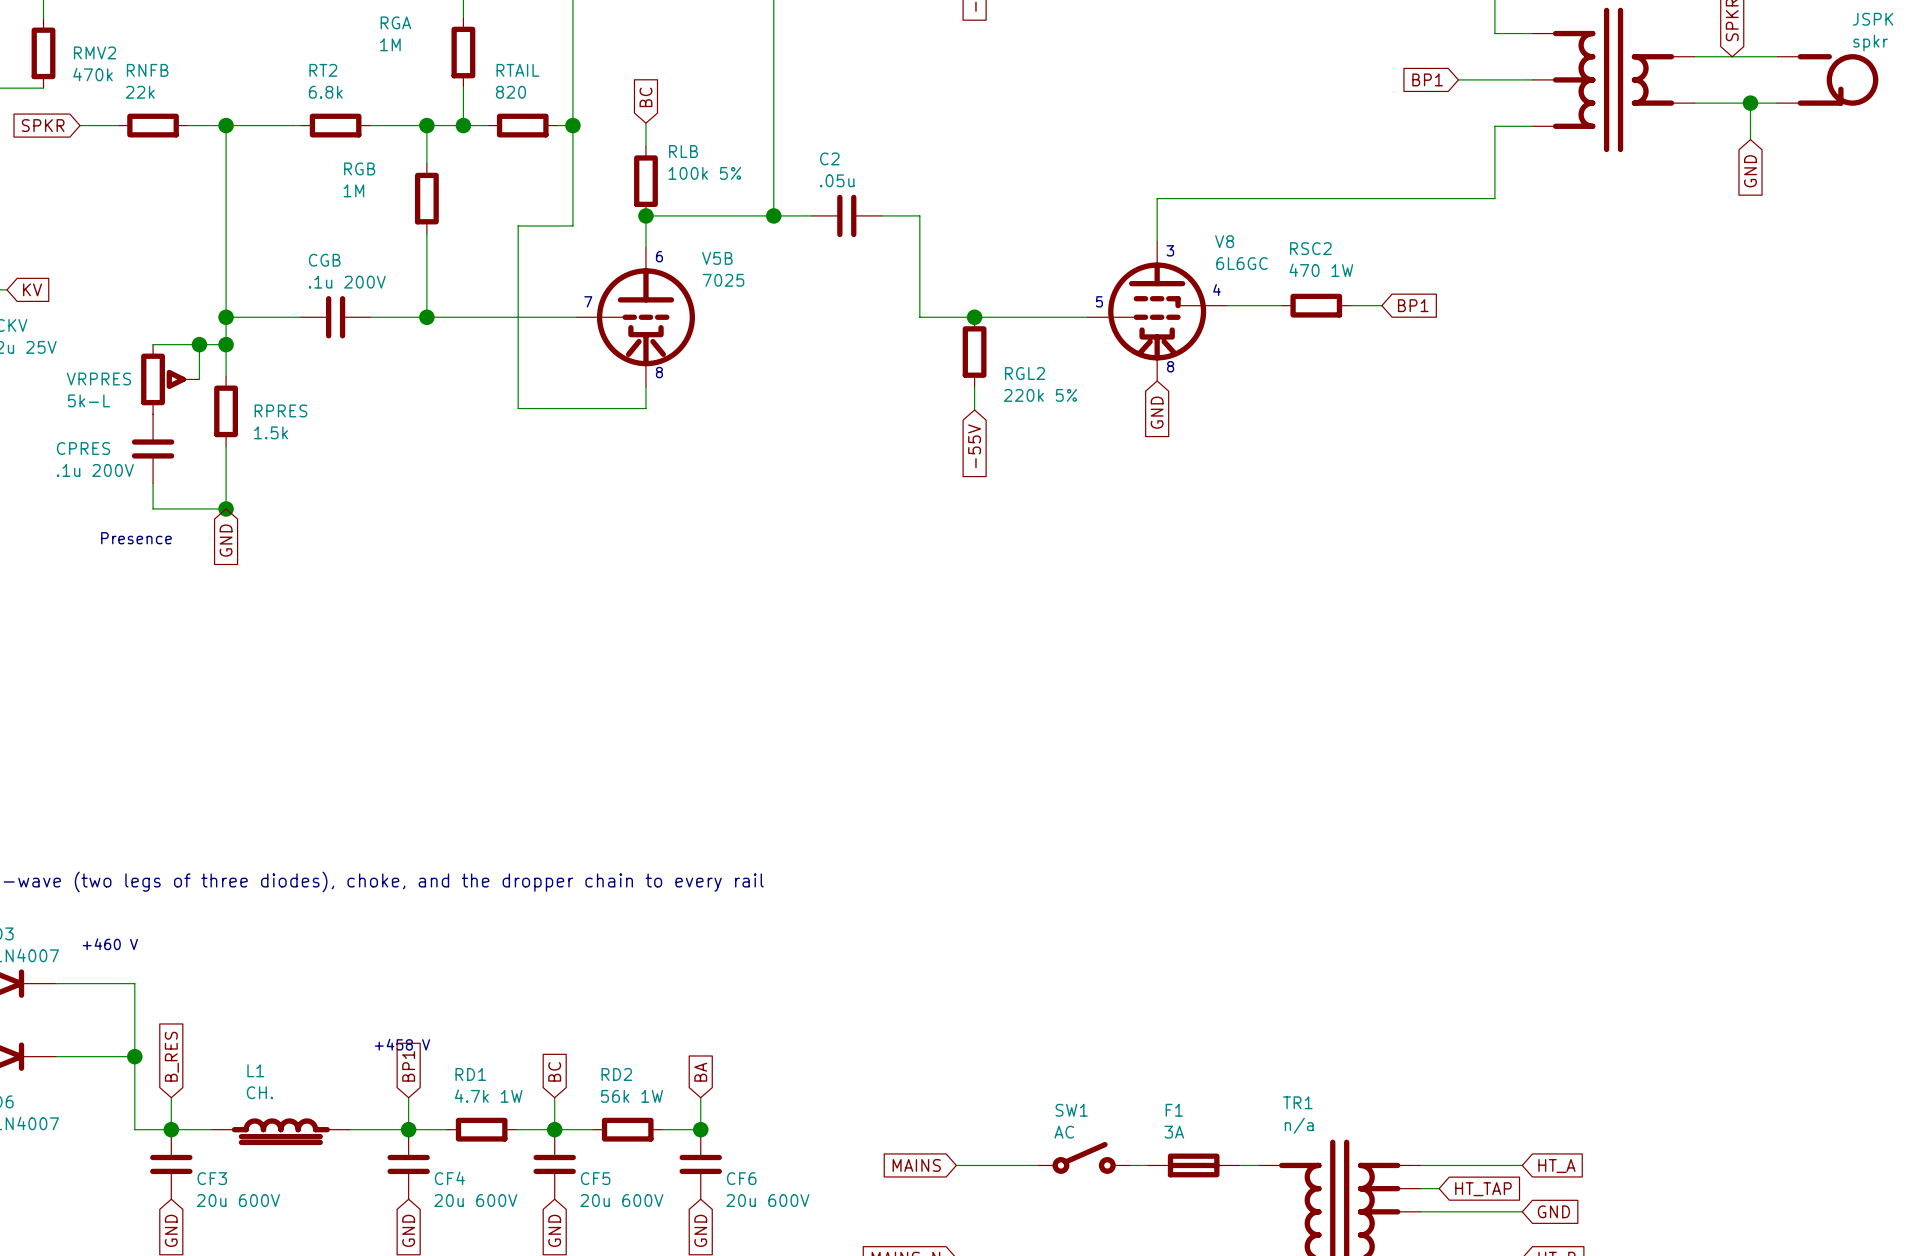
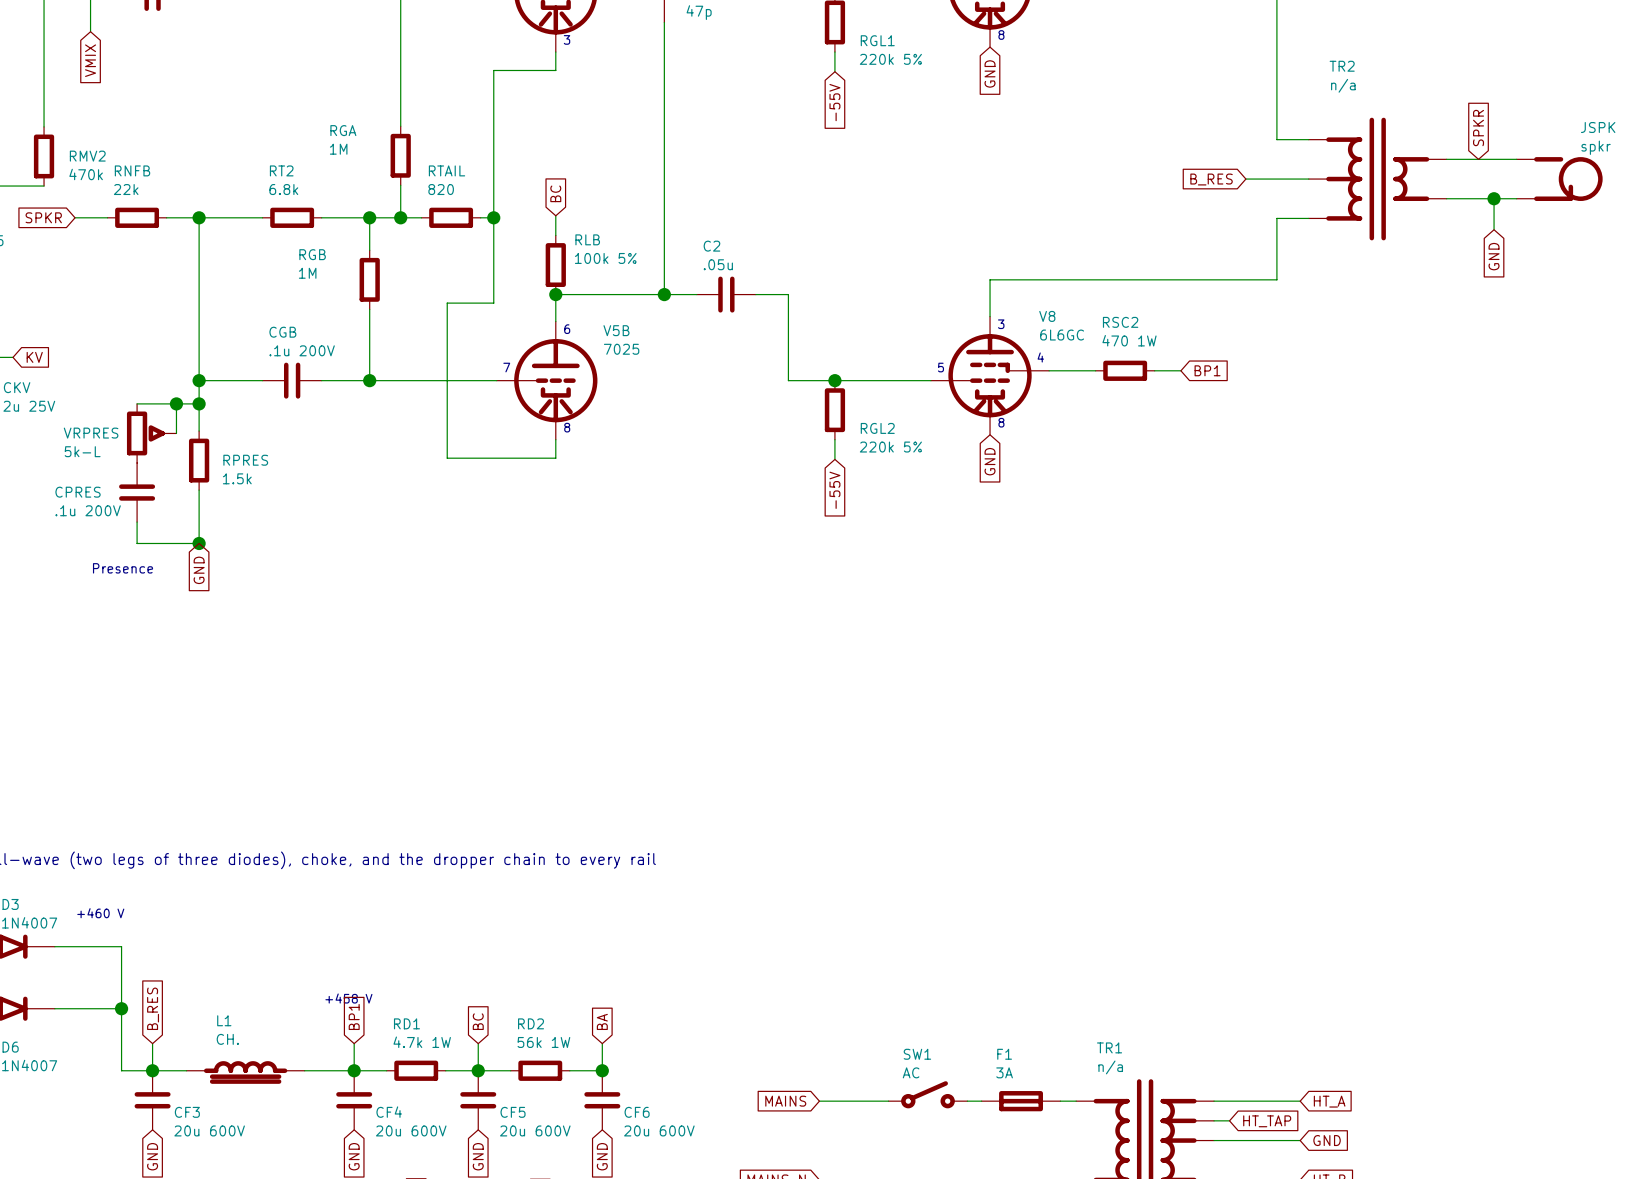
global label: BP1 (1427, 79) -> B_RES (1211, 179)

